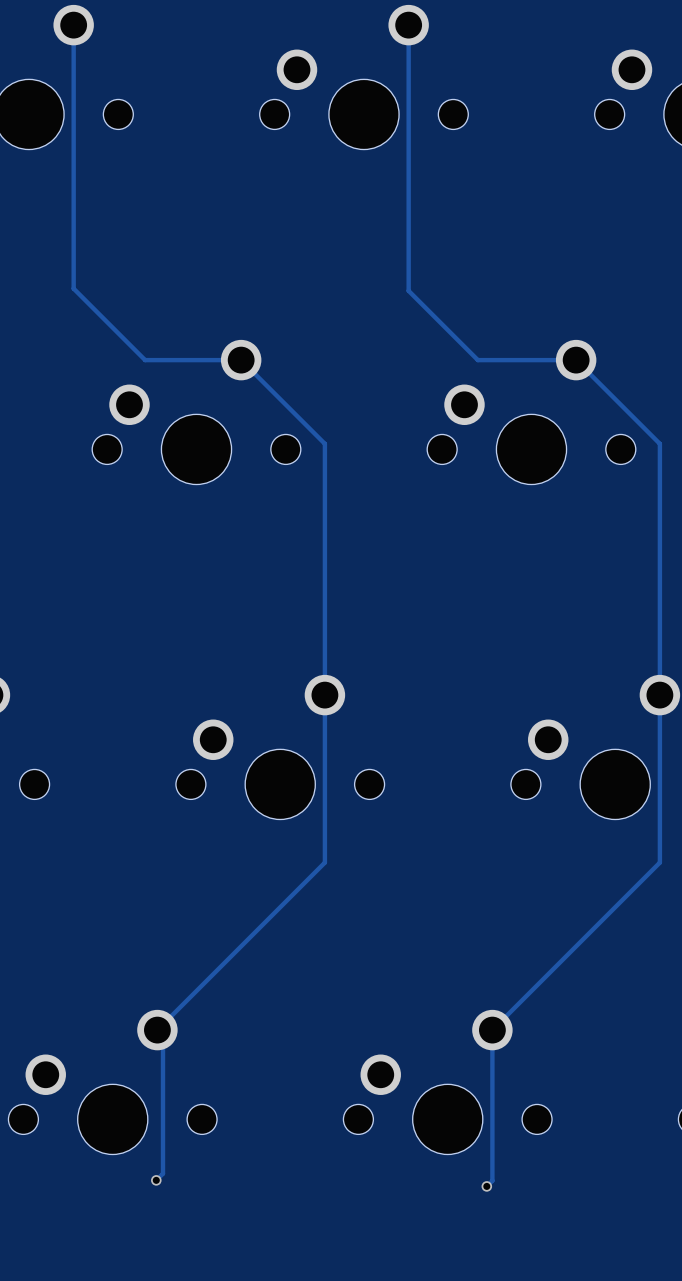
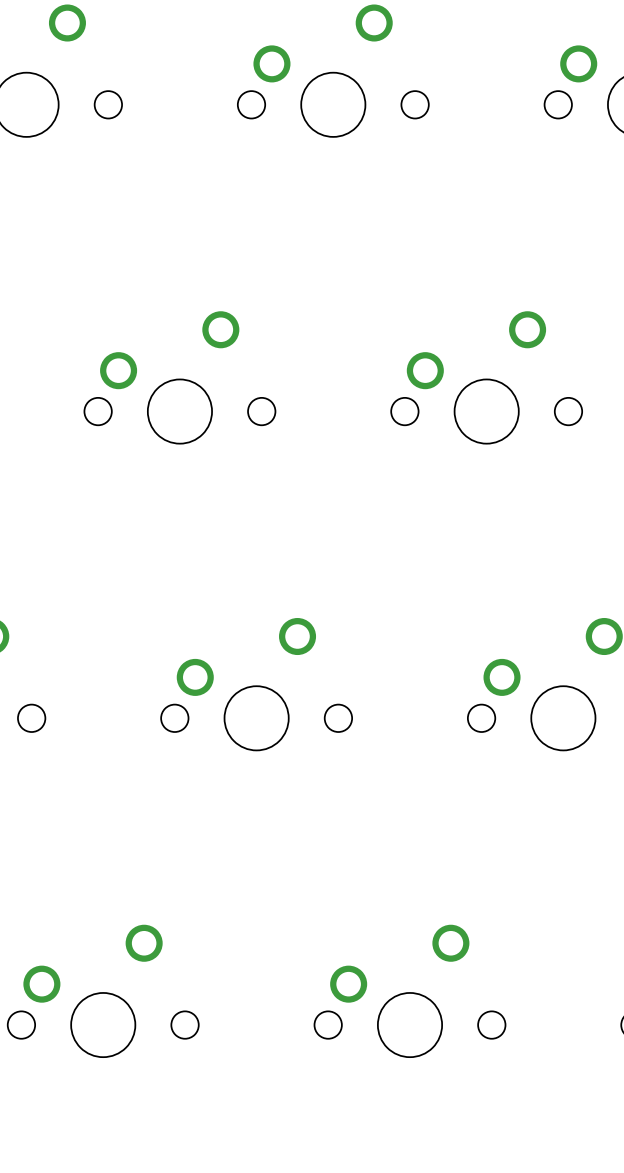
track: (73, 25) (73, 288) (145, 360) (241, 360) (324, 443) (324, 862) (157, 1030) (163, 1035) (163, 1173) (156, 1180) -> none
track: (408, 25) (408, 290) (477, 360) (576, 360) (659, 443) (659, 862) (492, 1030) (492, 1180) (486, 1186) -> none
via: (156, 1180) -> none
via: (486, 1186) -> none

